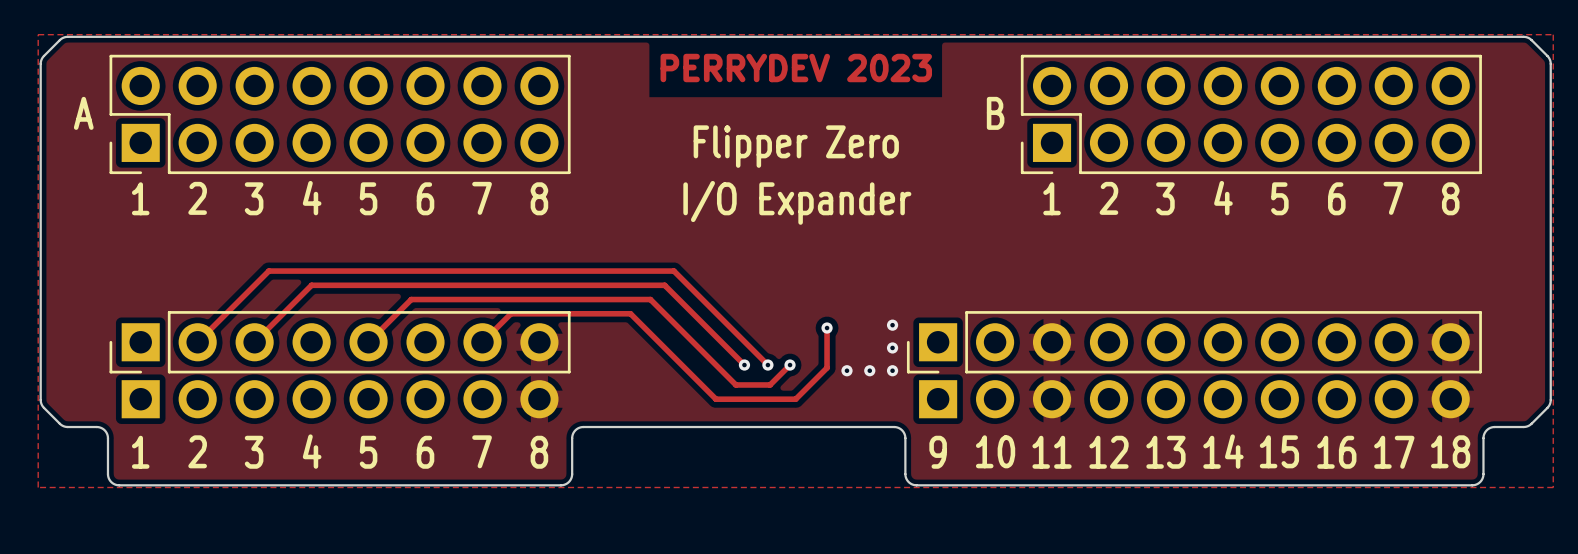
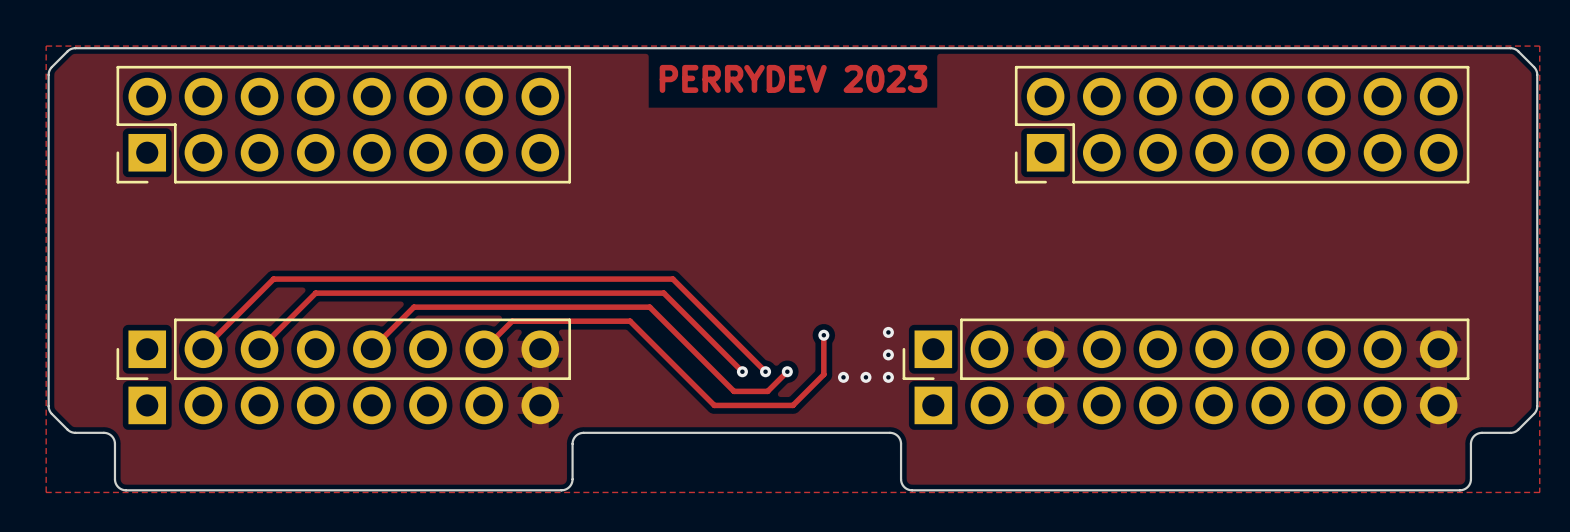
text: A (83, 113) -> none
text: B (995, 113) -> none
text: Flipper Zero (796, 146) -> none
text: 1 (140, 198) -> none
text: 2 (197, 198) -> none
text: 3 (254, 198) -> none
text: 4 (312, 198) -> none
text: 5 (368, 198) -> none
text: 6 (425, 198) -> none
text: 7 (482, 198) -> none
text: 8 (539, 198) -> none
text: 1 (1052, 198) -> none
text: 2 (1108, 198) -> none
text: 3 (1165, 198) -> none
text: 4 (1223, 198) -> none
text: 5 (1279, 198) -> none
text: 6 (1336, 198) -> none
text: 7 (1393, 198) -> none
text: 8 (1450, 198) -> none
text: I/O Expander (797, 202) -> none
text: 2 (197, 451) -> none
text: 4 (312, 451) -> none
text: 7 (482, 451) -> none
text: 10 (995, 451) -> none
text: 14 (1223, 451) -> none
text: 15 (1279, 451) -> none
text: 18 (1450, 451) -> none
text: 1 (140, 452) -> none
text: 3 (254, 452) -> none
text: 5 (368, 452) -> none
text: 6 (425, 452) -> none
text: 8 (539, 452) -> none
text: 9 (938, 452) -> none
text: 11 (1052, 452) -> none
text: 12 (1108, 452) -> none
text: 13 (1165, 452) -> none
text: 16 (1336, 452) -> none
text: 17 (1394, 452) -> none

